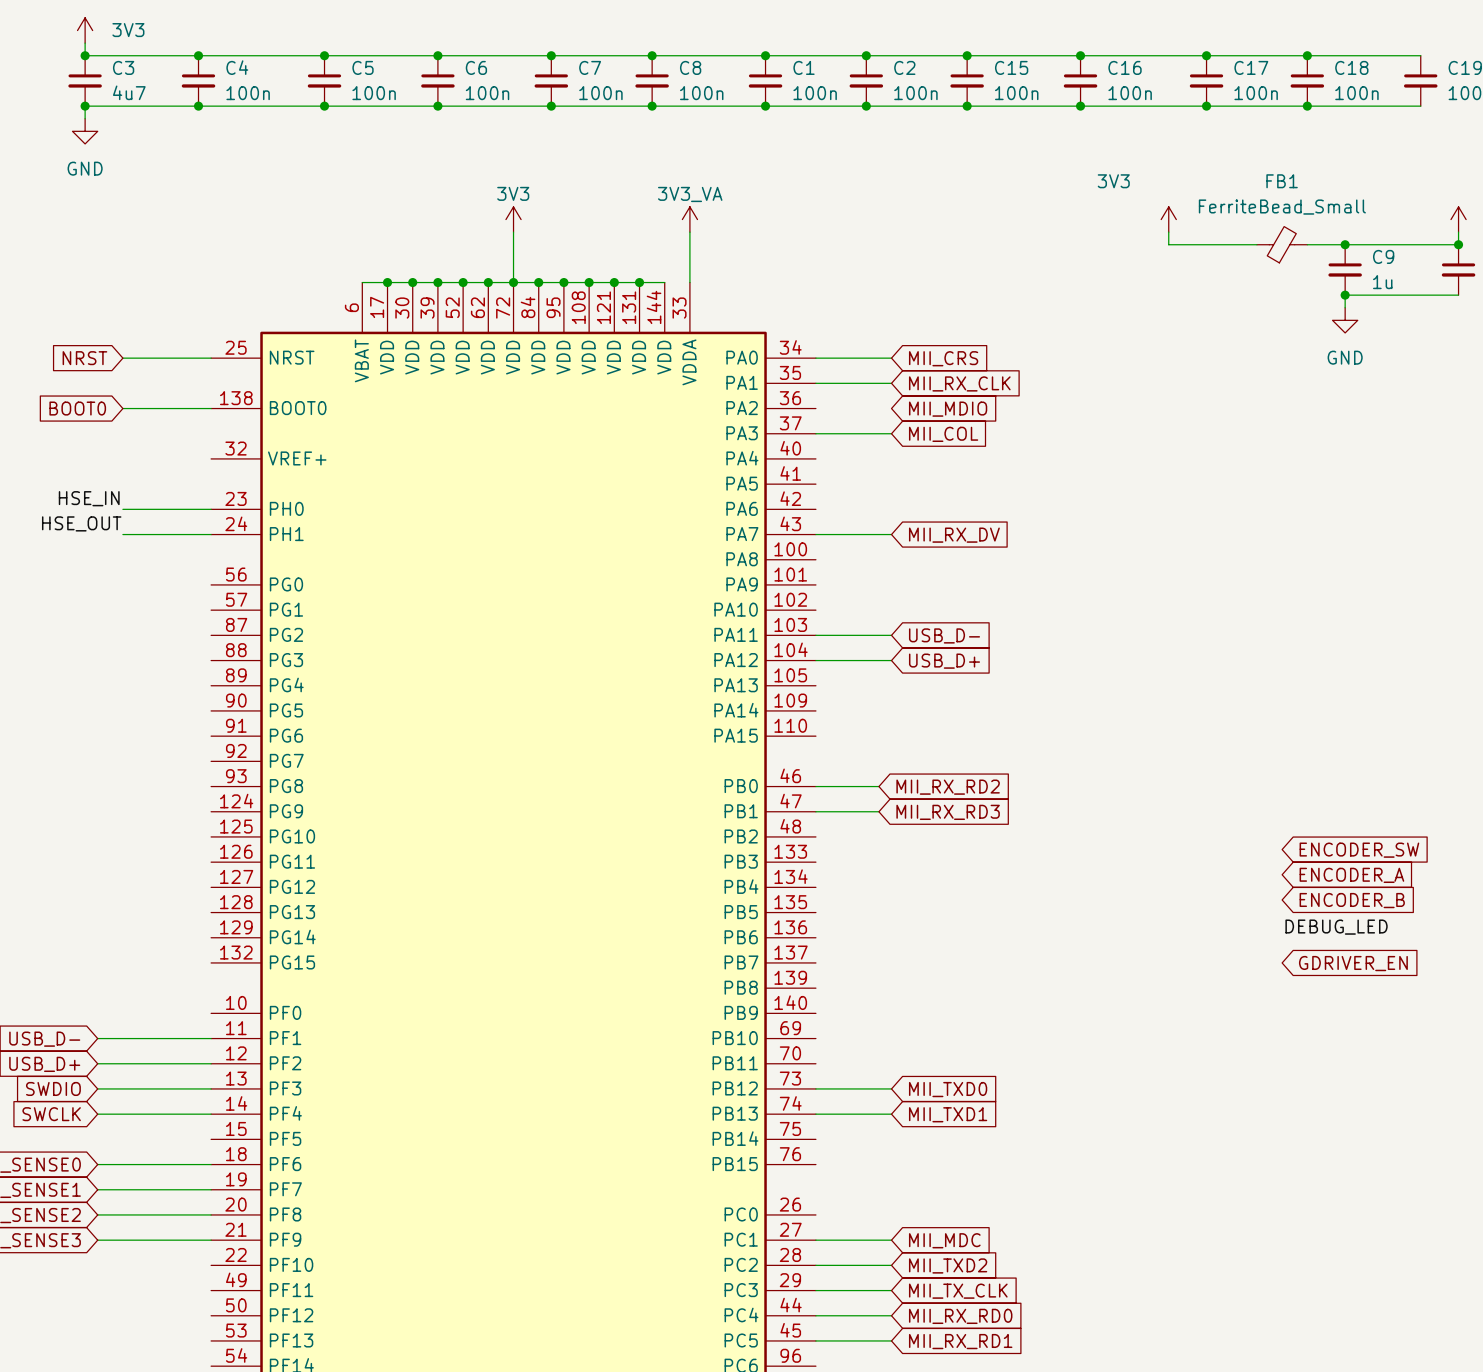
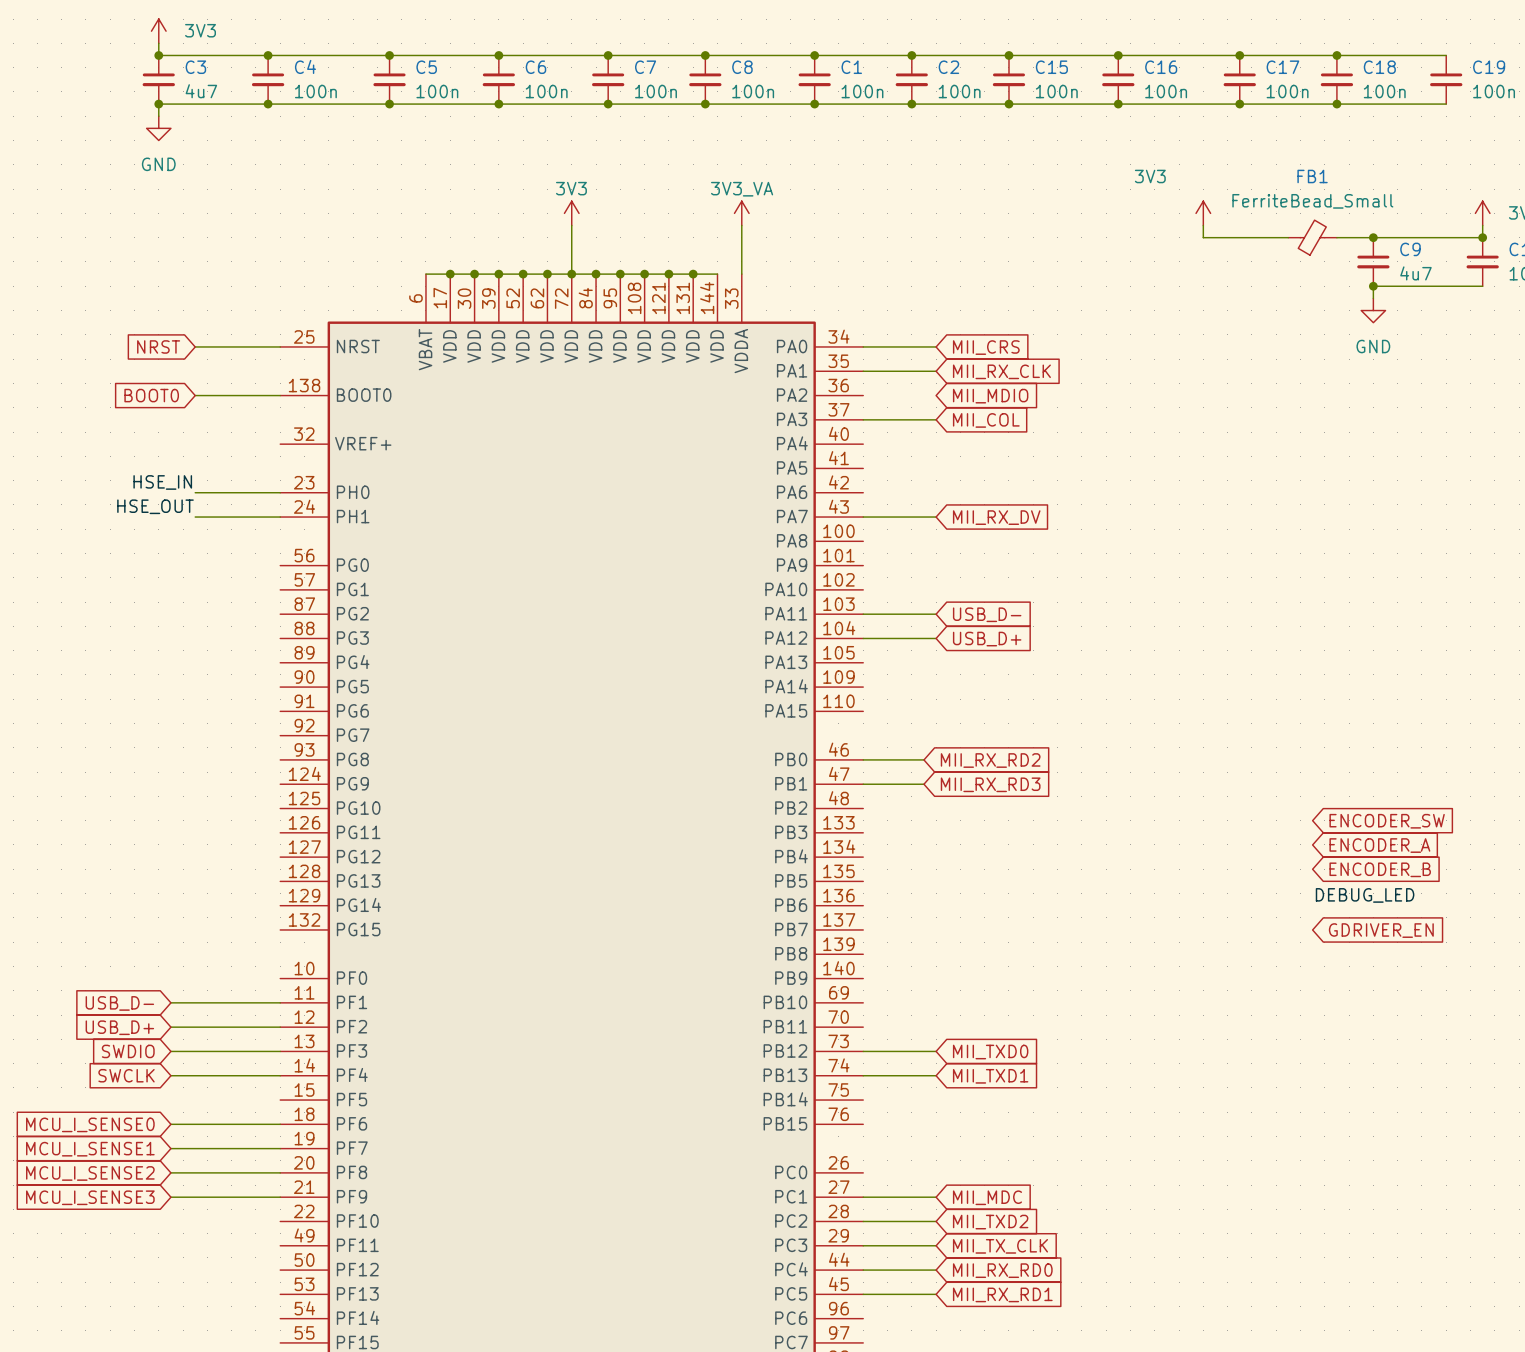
C9 value: 1u (1382, 282) -> 4u7 (1415, 273)

